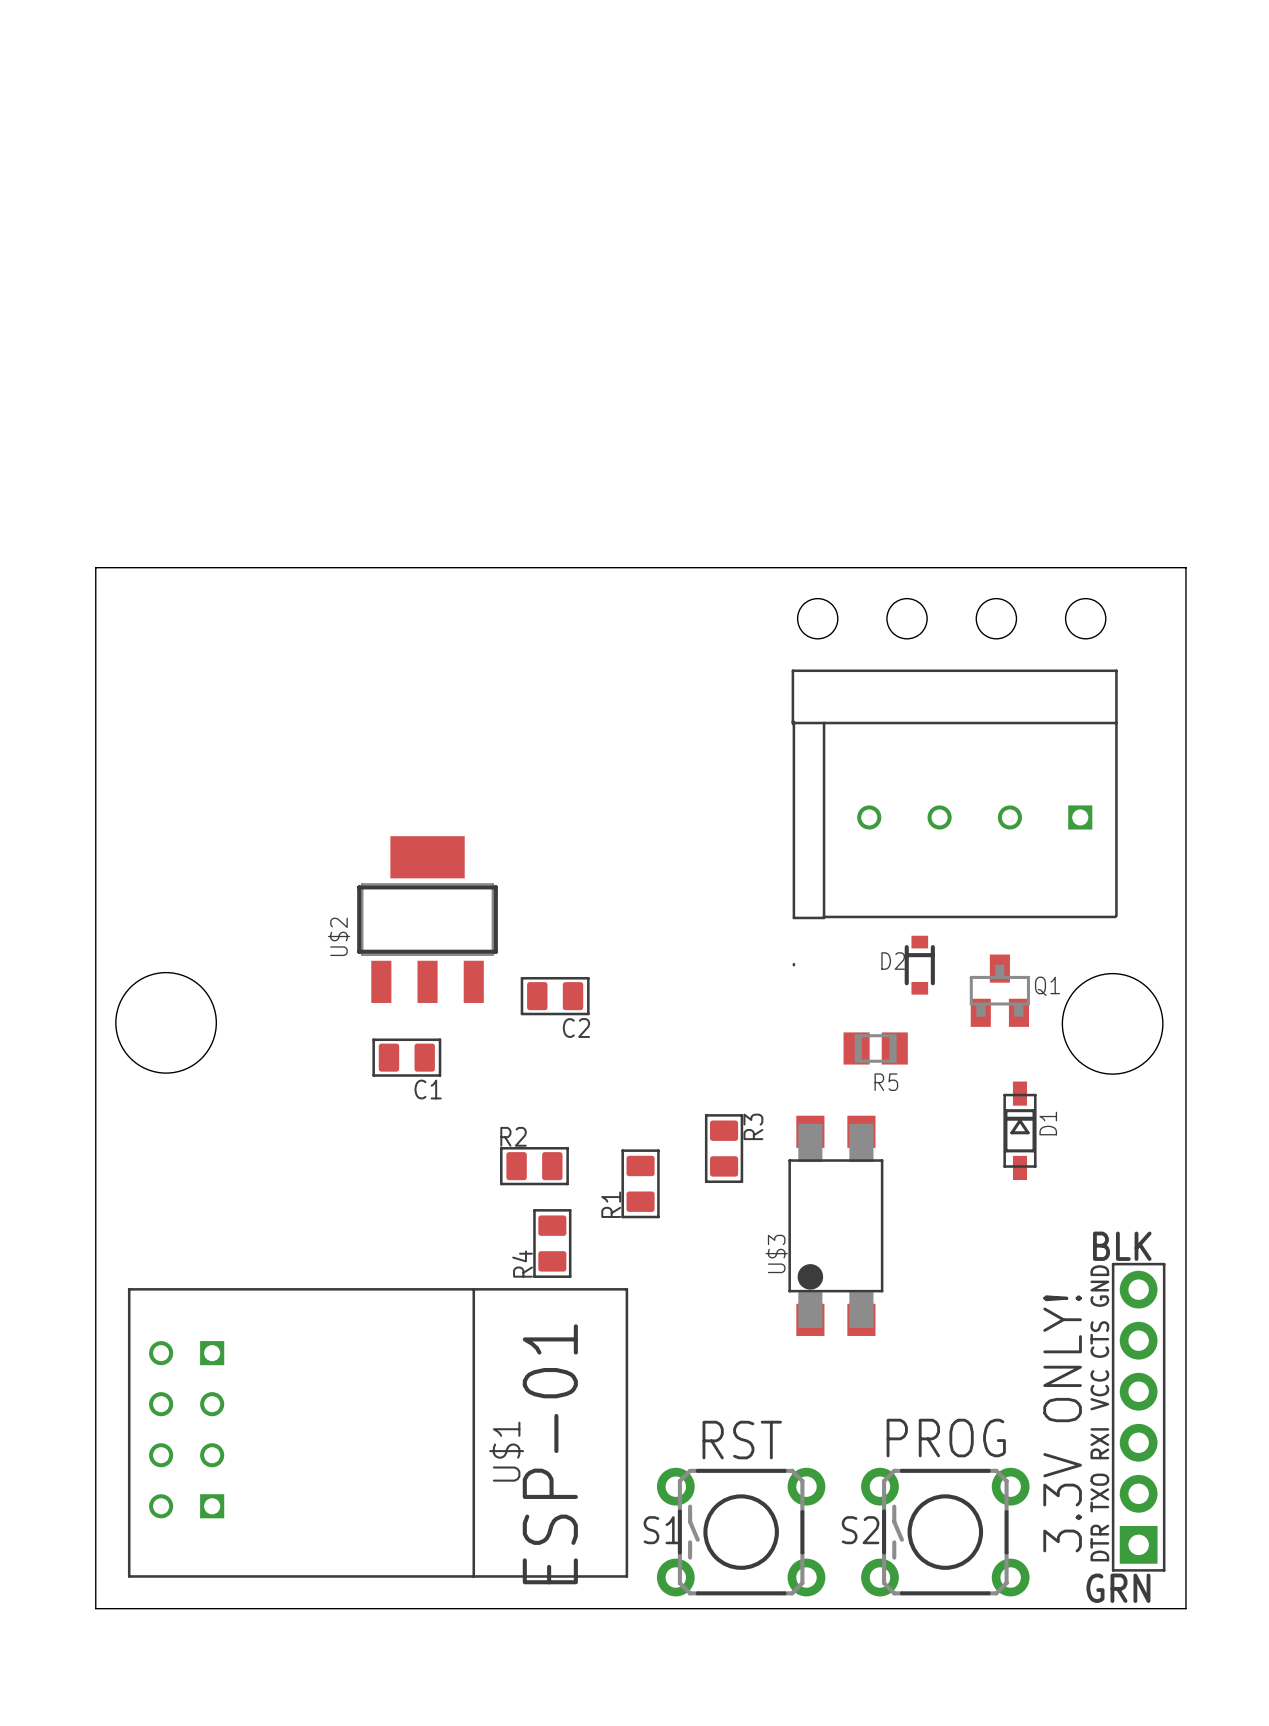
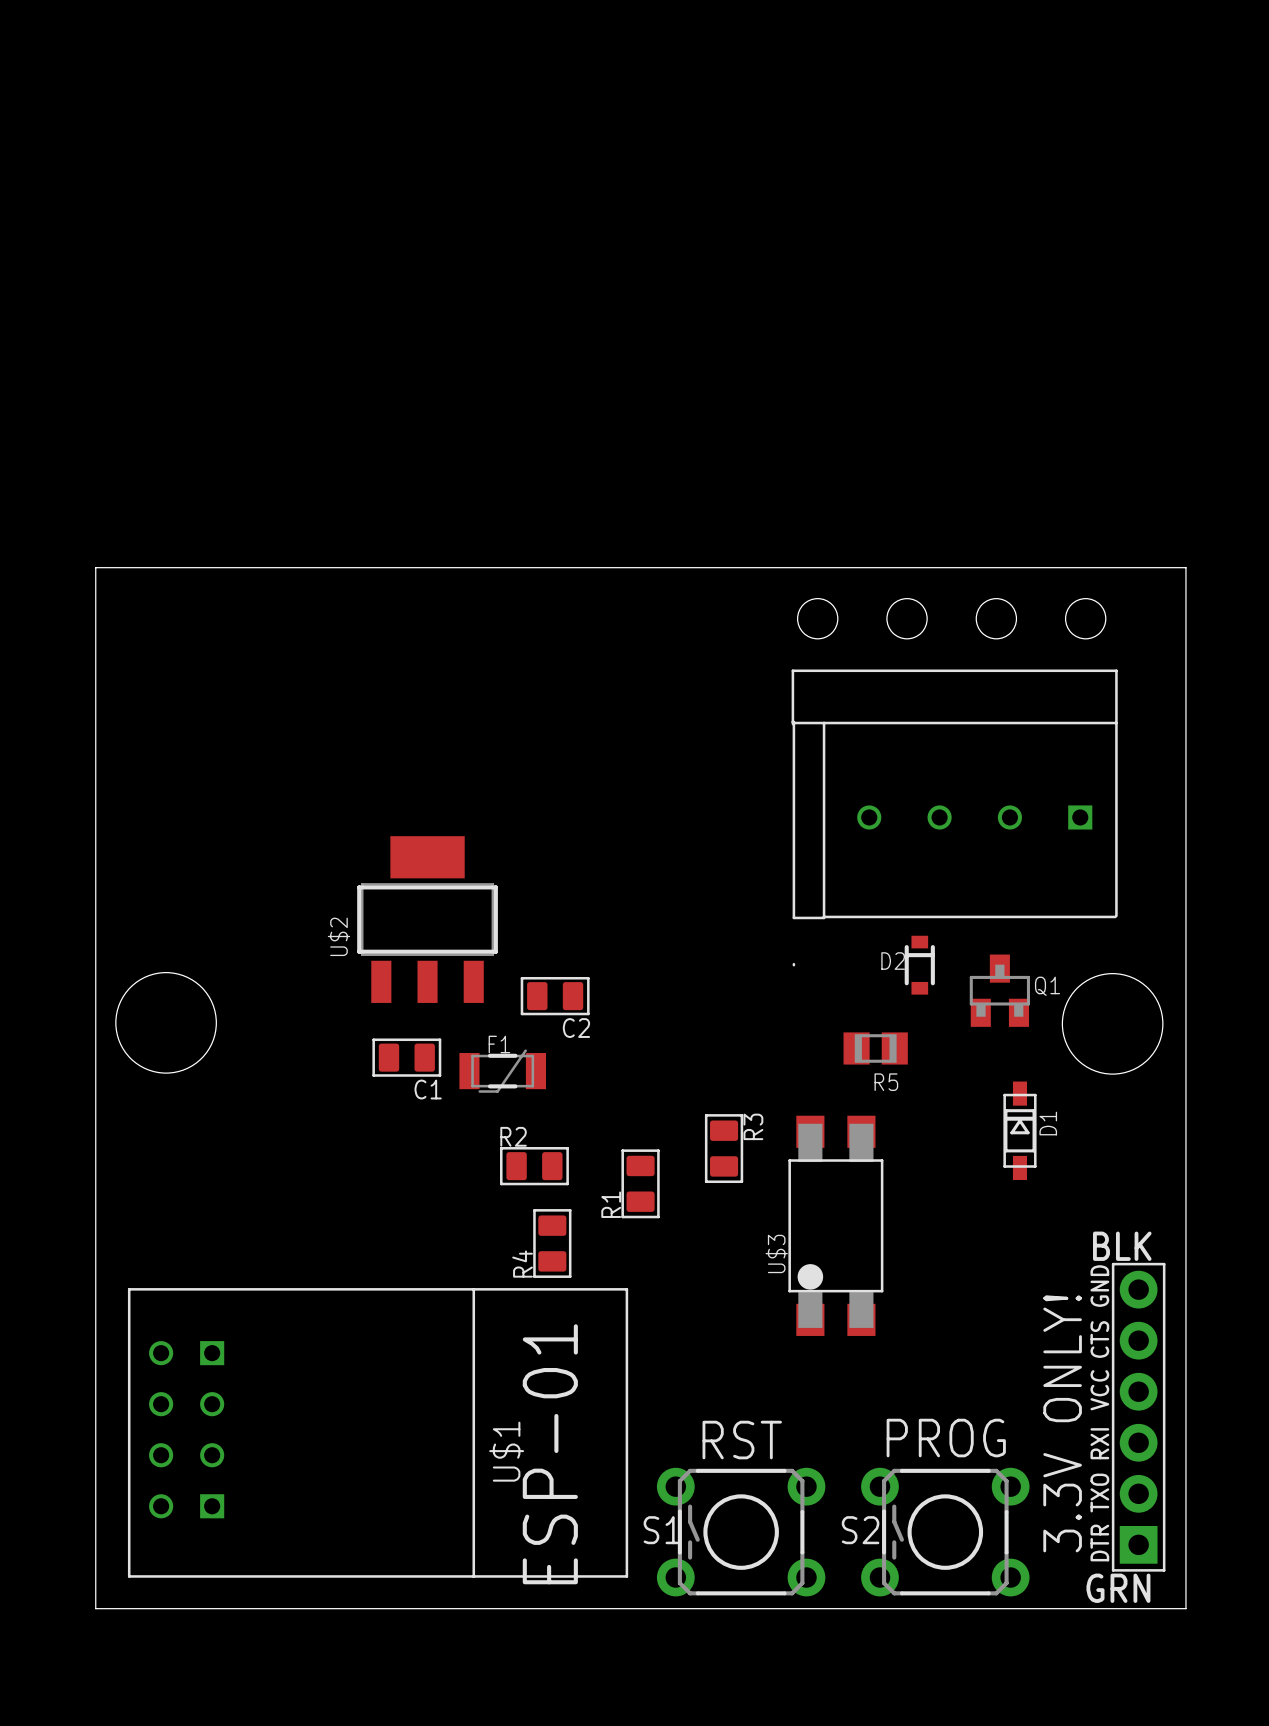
F1: none -> (502, 1071)

